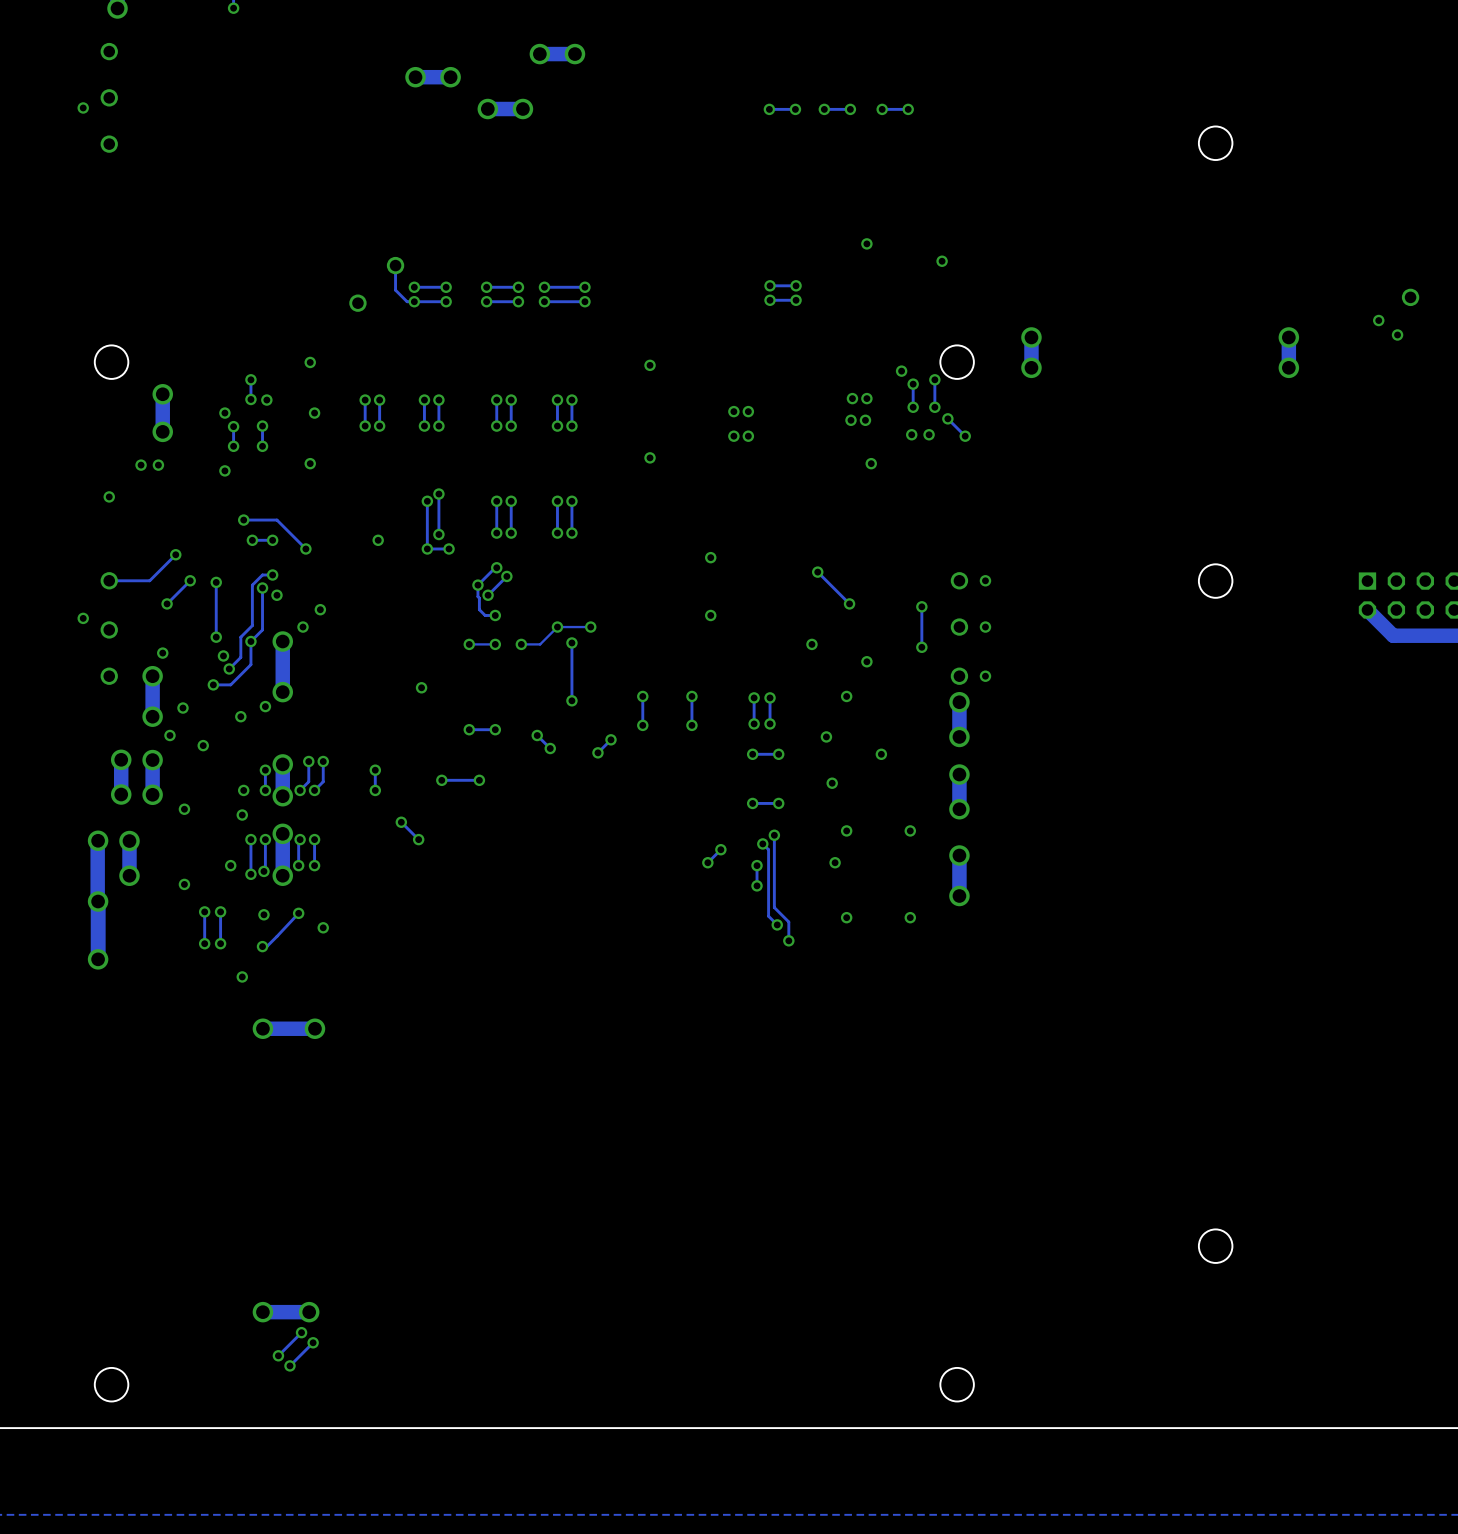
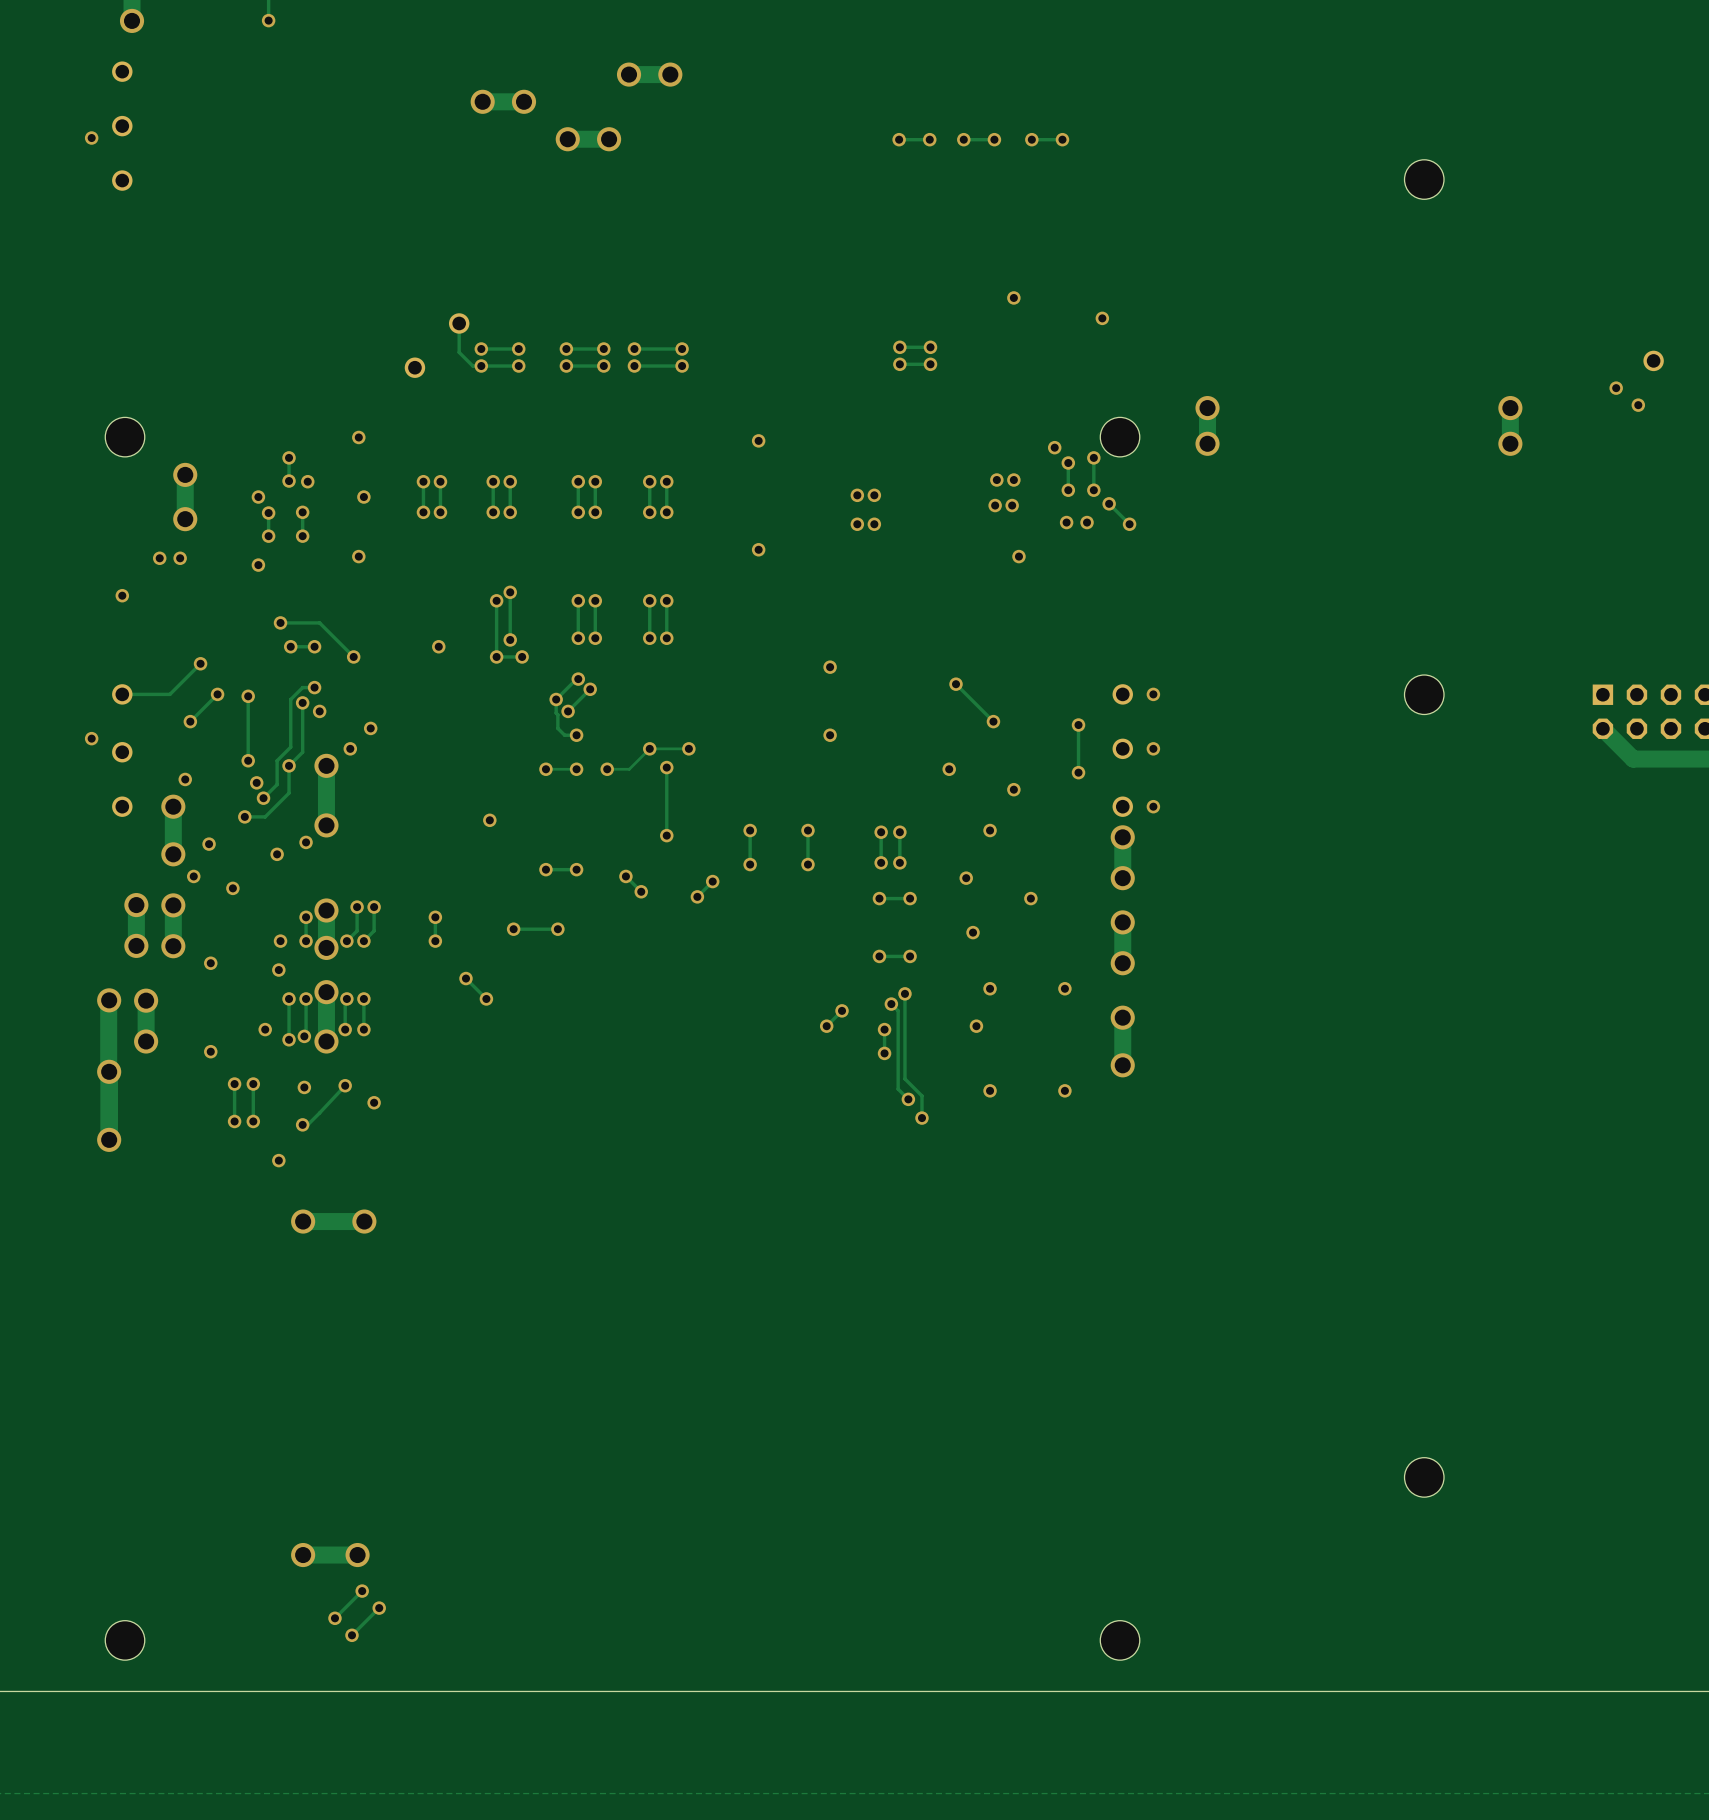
track: (301, 1332) (278, 1355) -> (379, 1608) (351, 1635)
via: (301, 1332) -> none
via: (278, 1355) -> none
via: none -> (379, 1608)
via: none -> (351, 1635)

